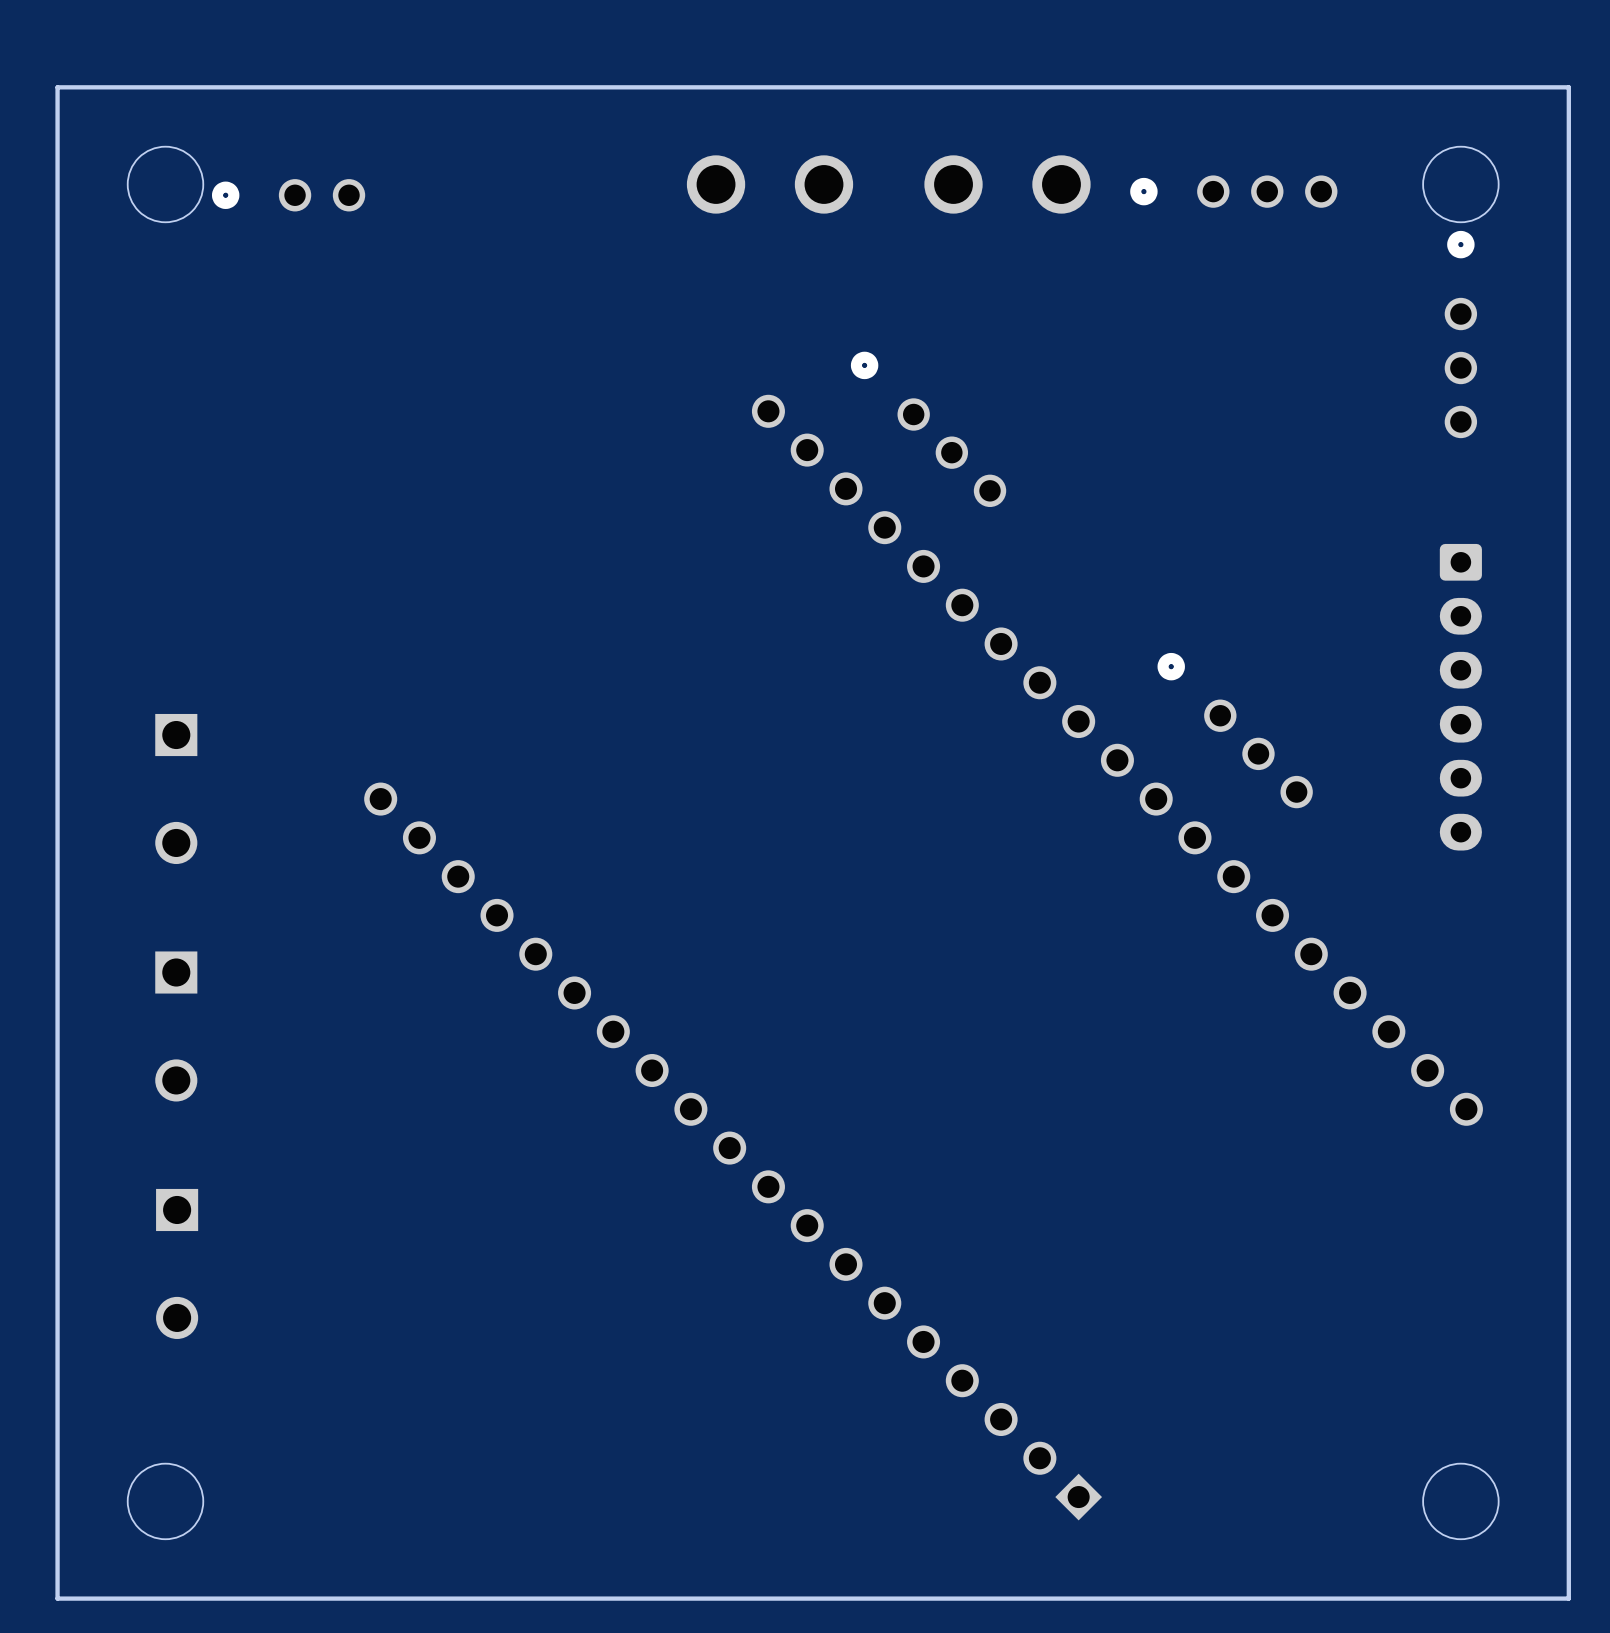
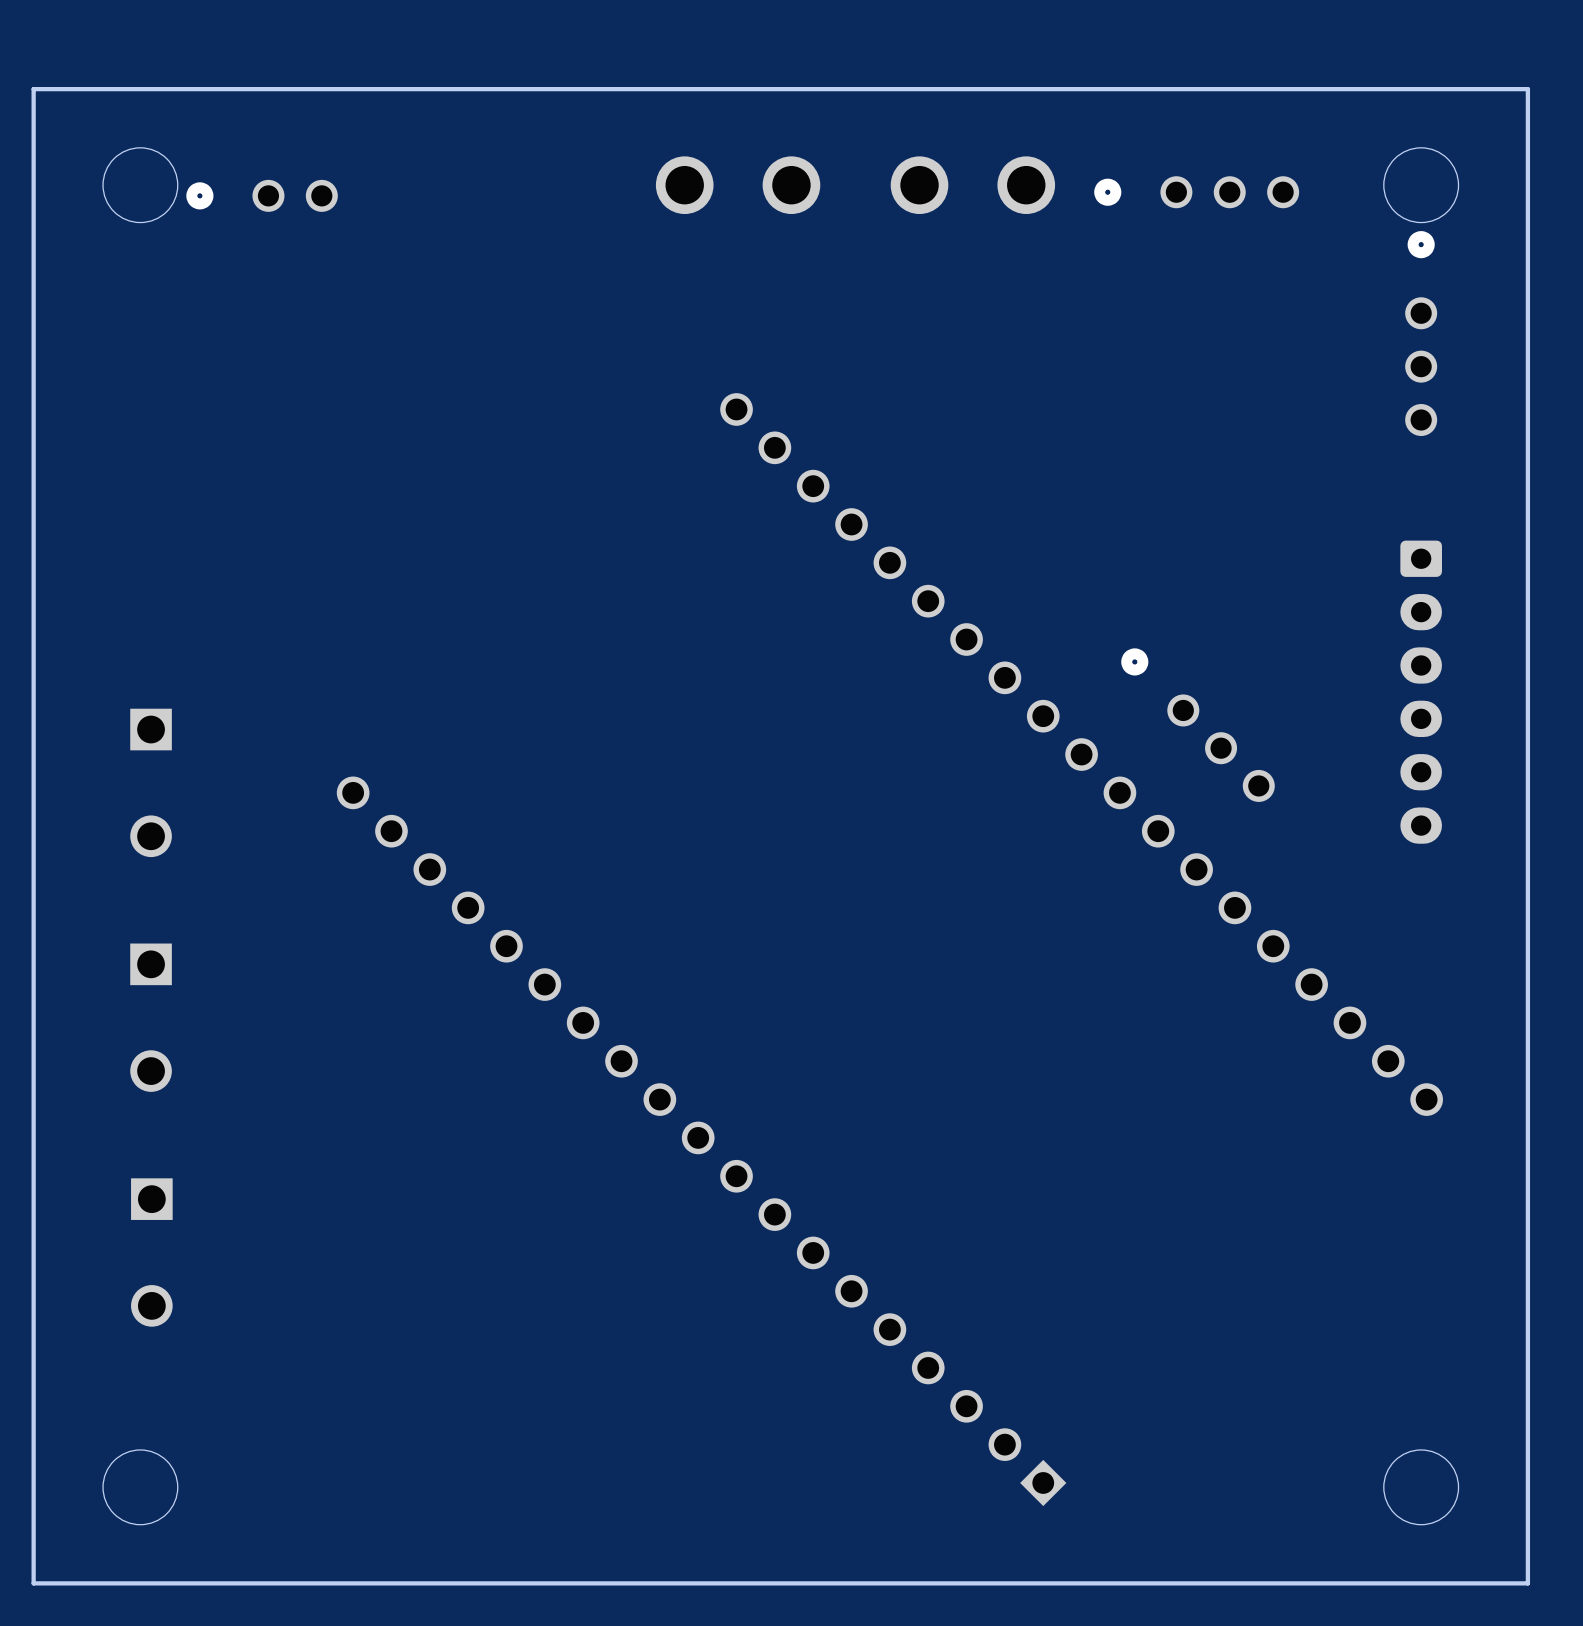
part: (928, 429) -> none

